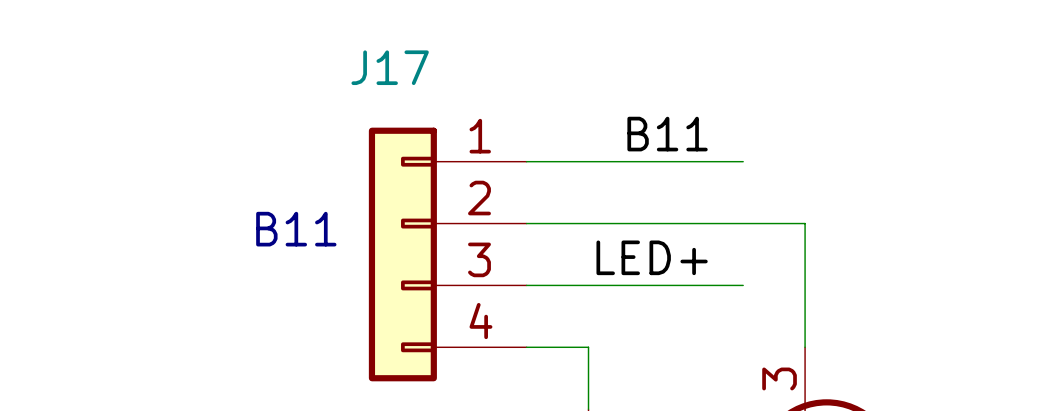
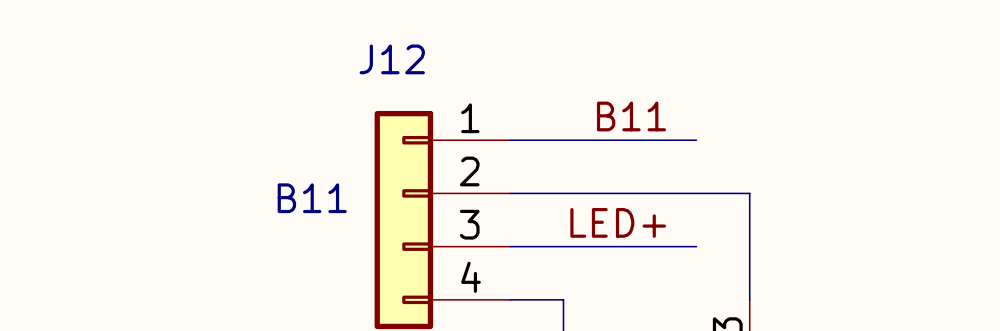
J17 name: J17 (390, 67) -> J12 (392, 59)

